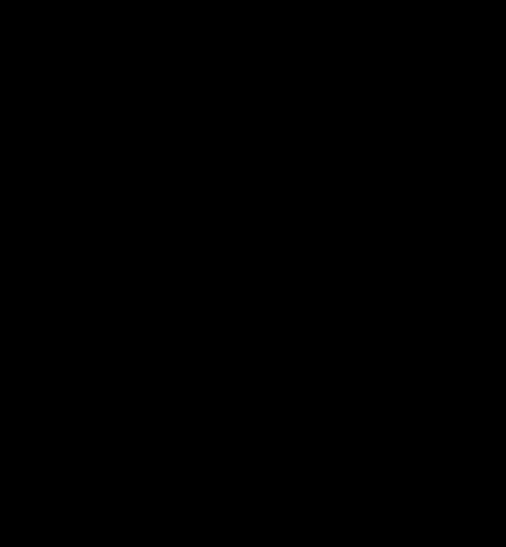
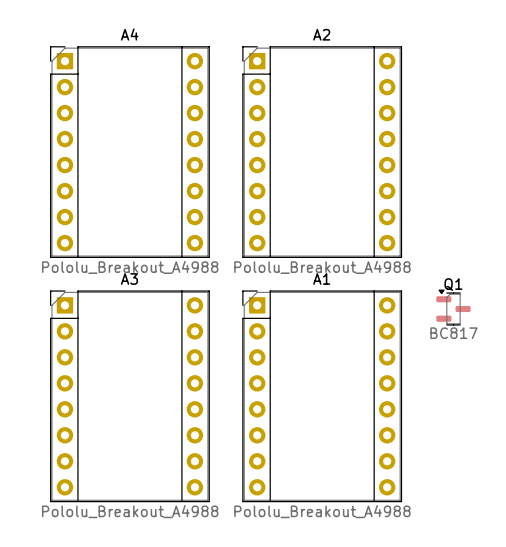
A4: none -> Pololu_Breakout_A4988 (129, 152)
A2: none -> Pololu_Breakout_A4988 (322, 152)
Q1: none -> BC817 (453, 307)
A3: none -> Pololu_Breakout_A4988 (129, 396)
A1: none -> Pololu_Breakout_A4988 (322, 396)

